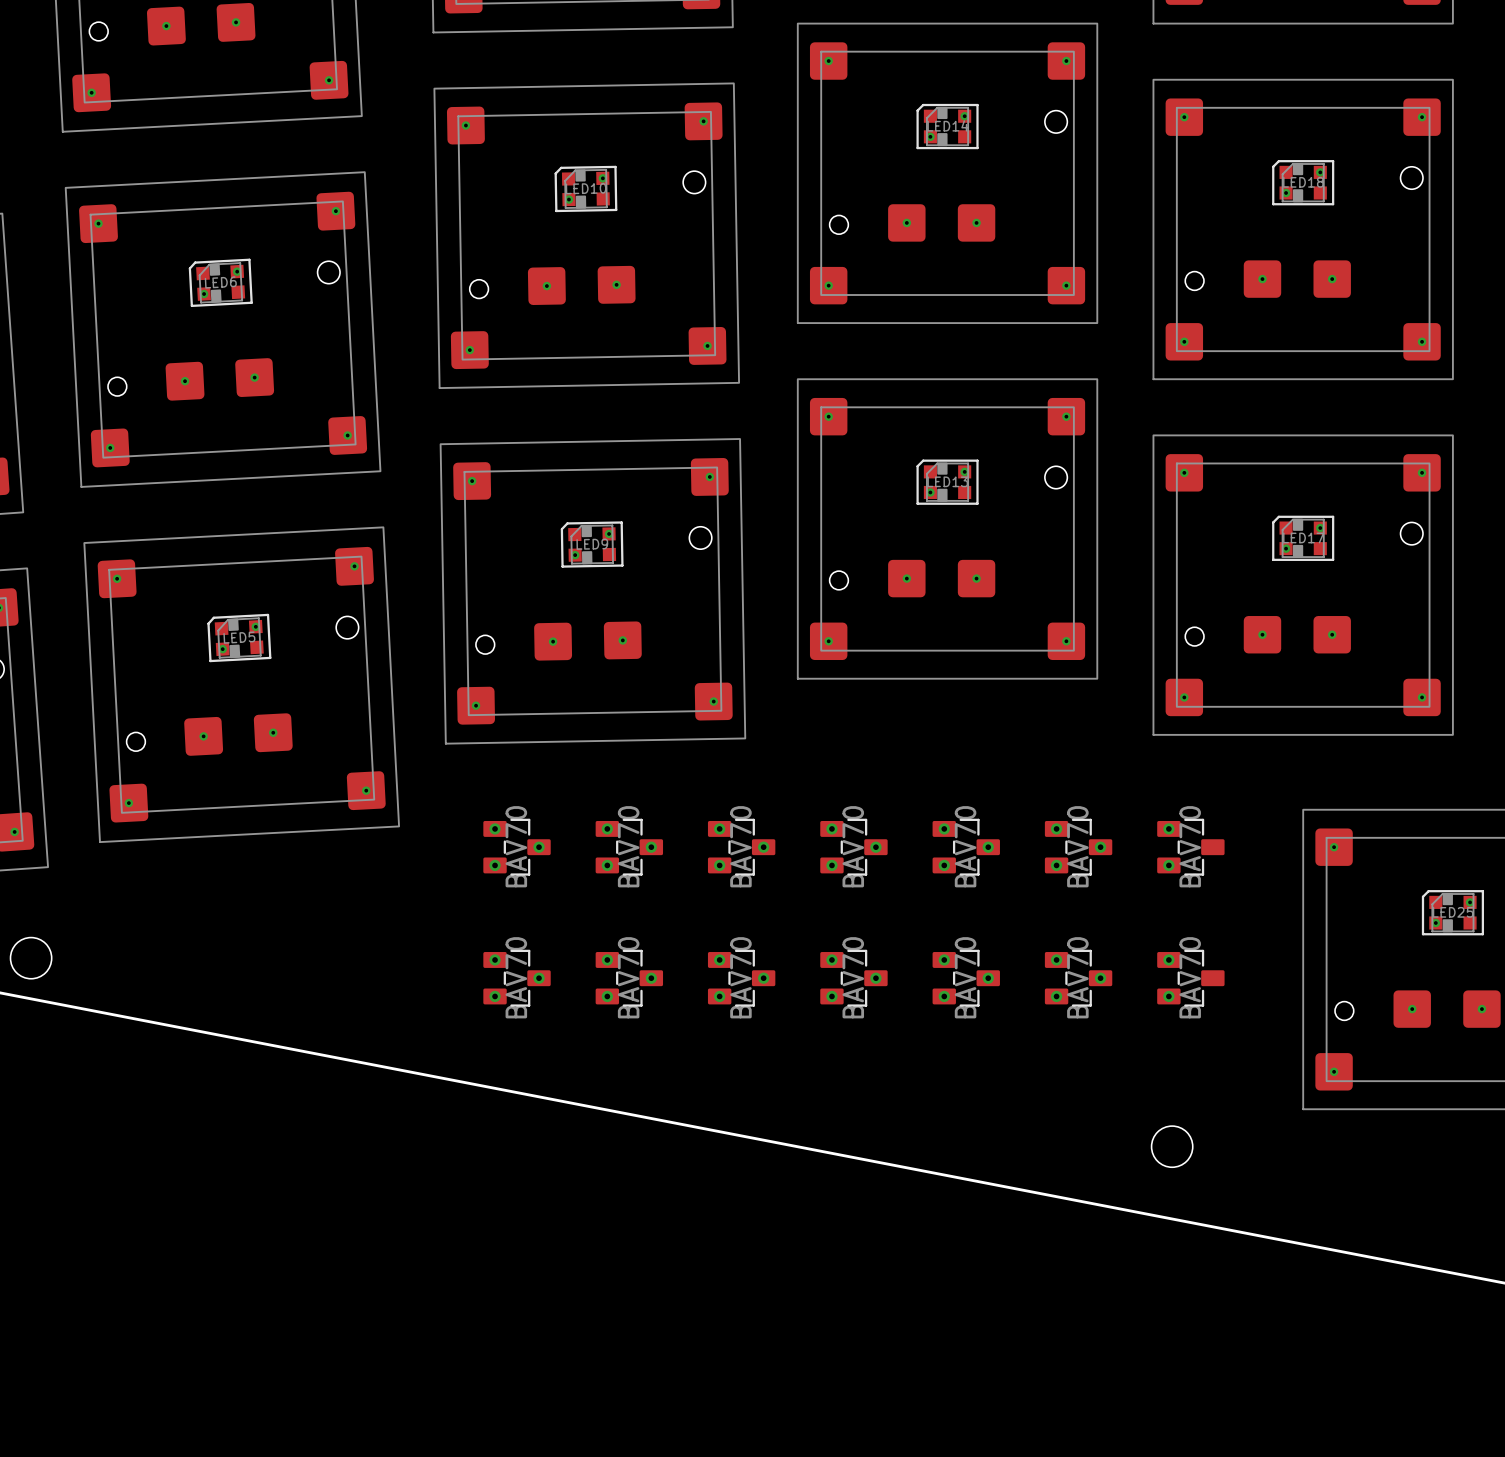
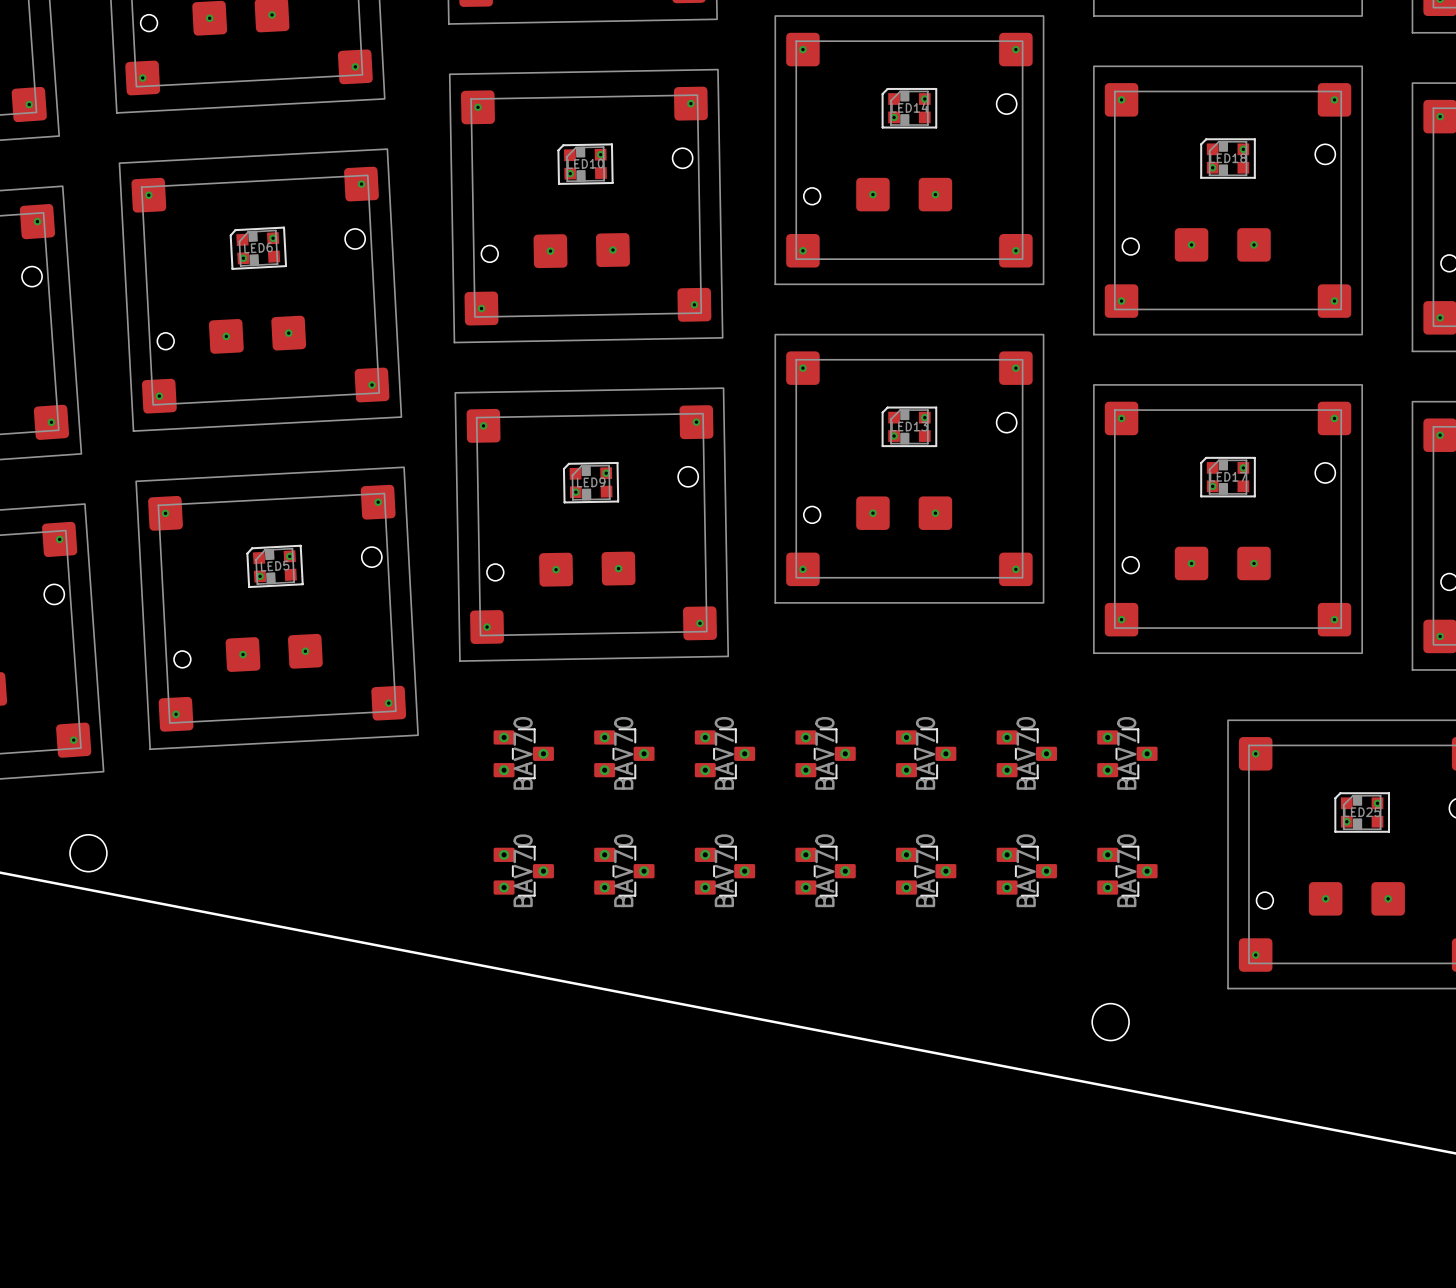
via: none -> (1147, 753)
via: none -> (1147, 871)

